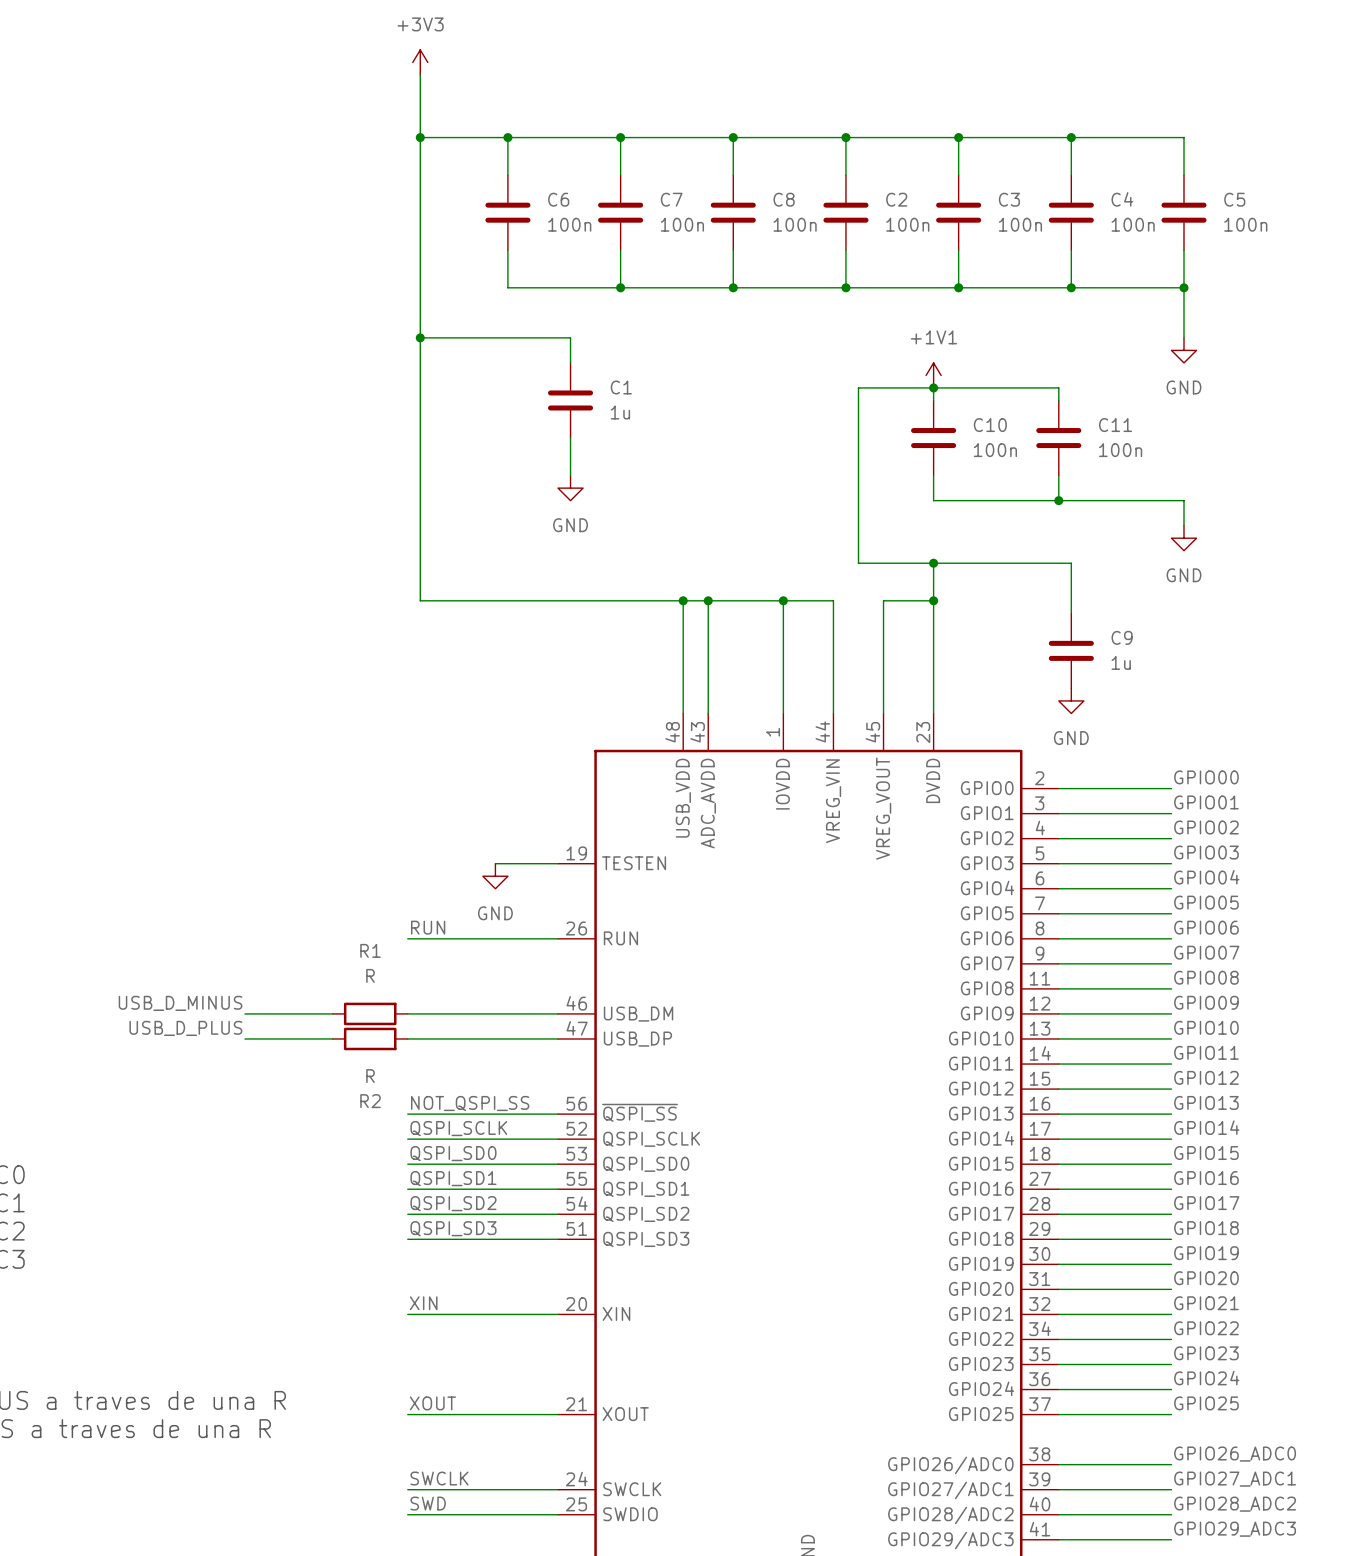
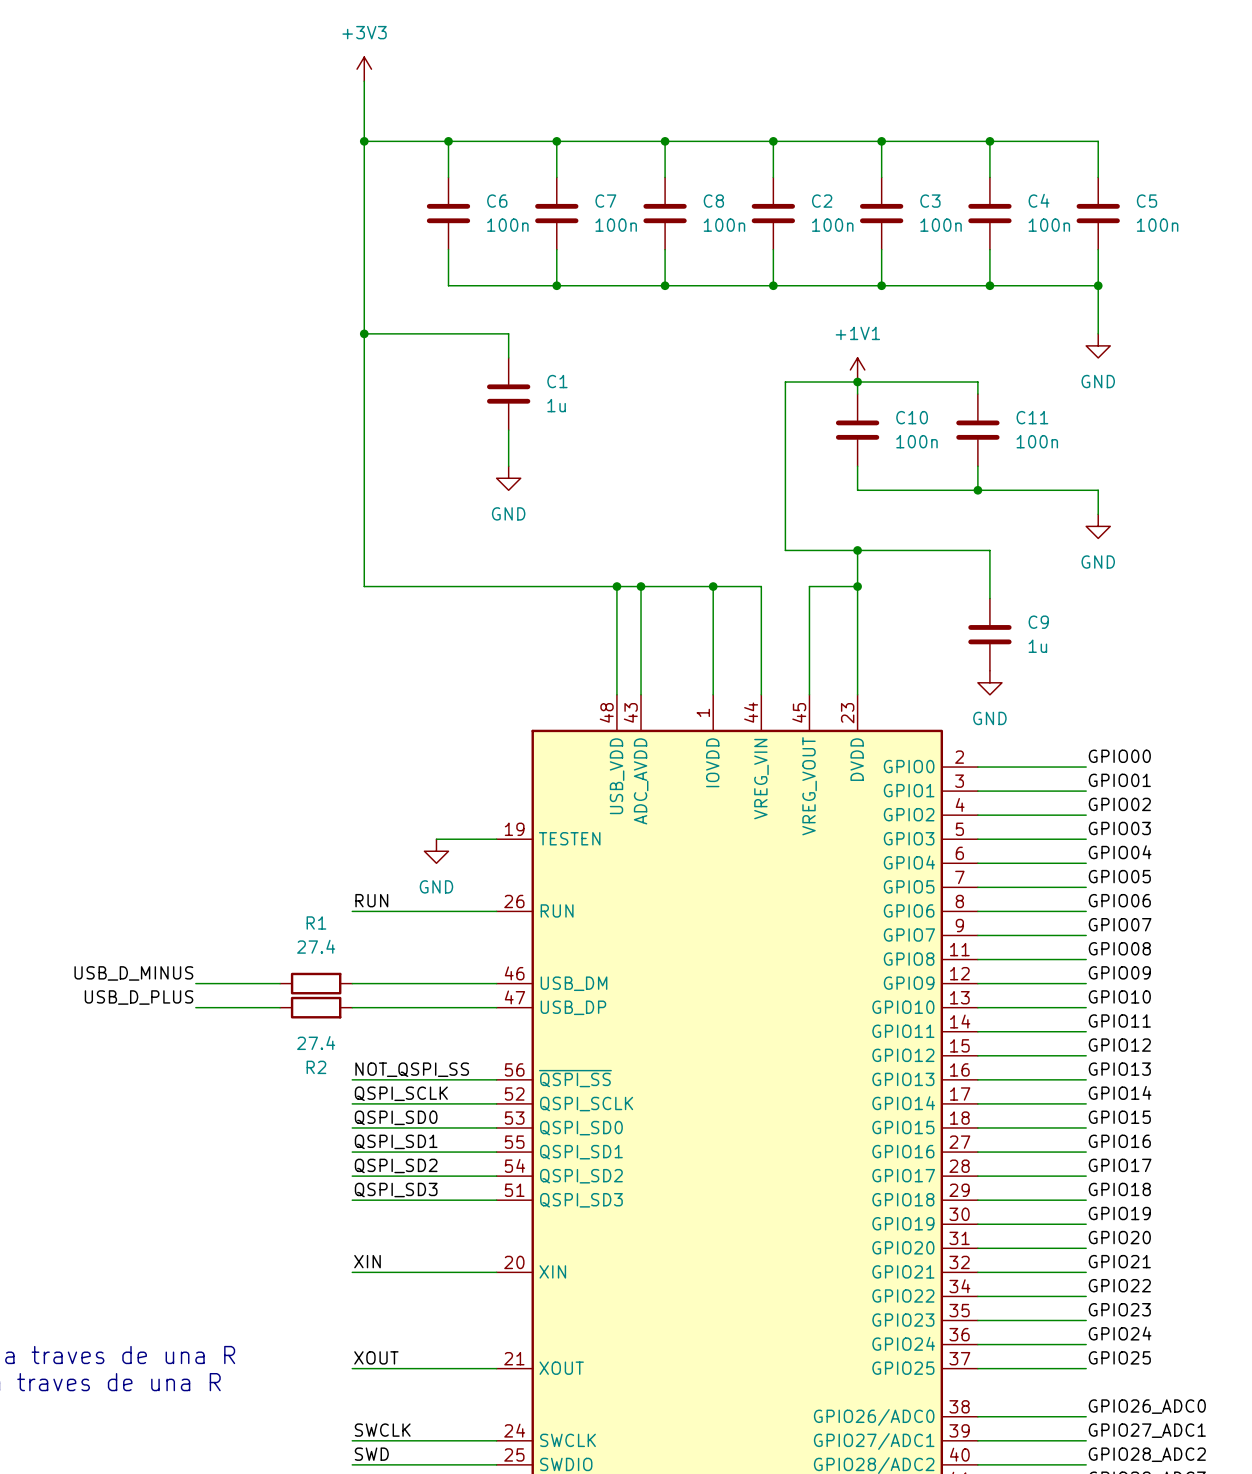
R1 value: R (370, 975) -> 27.4 (316, 946)
R2 value: R (370, 1076) -> 27.4 (316, 1043)

